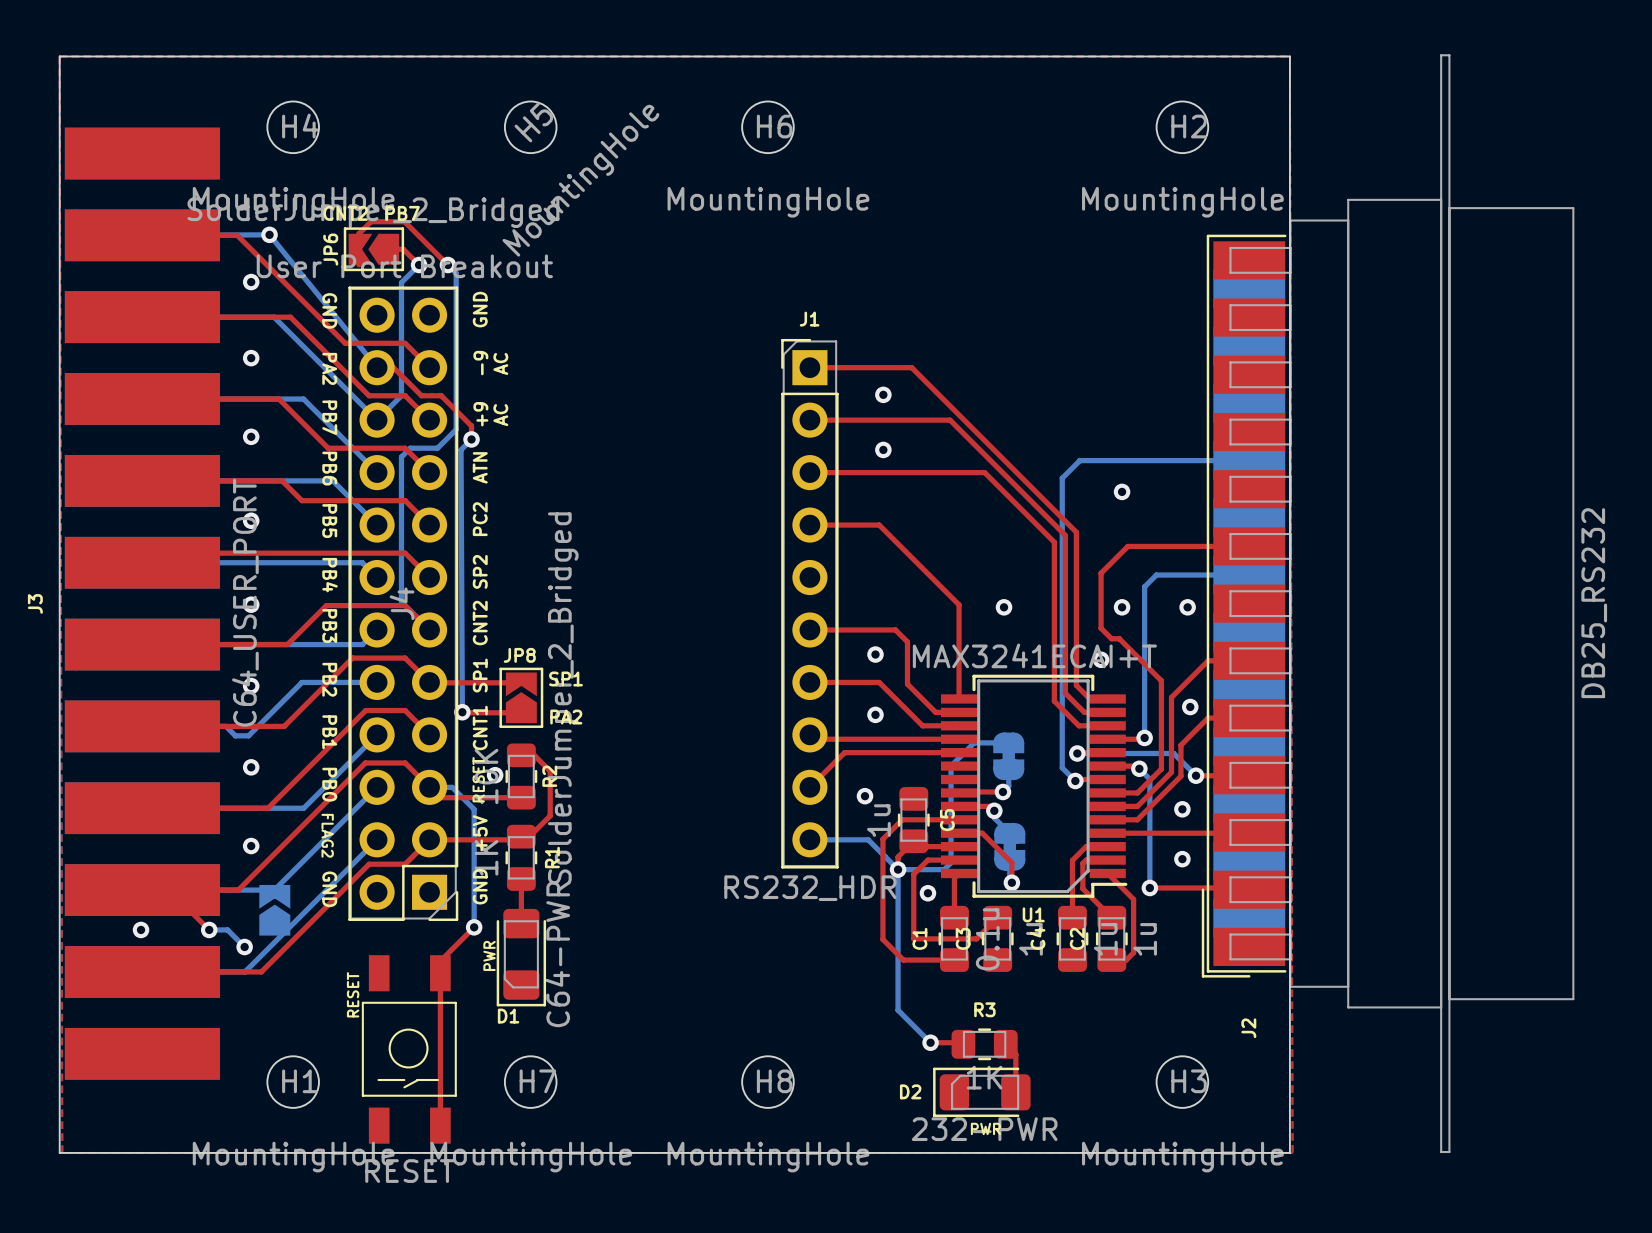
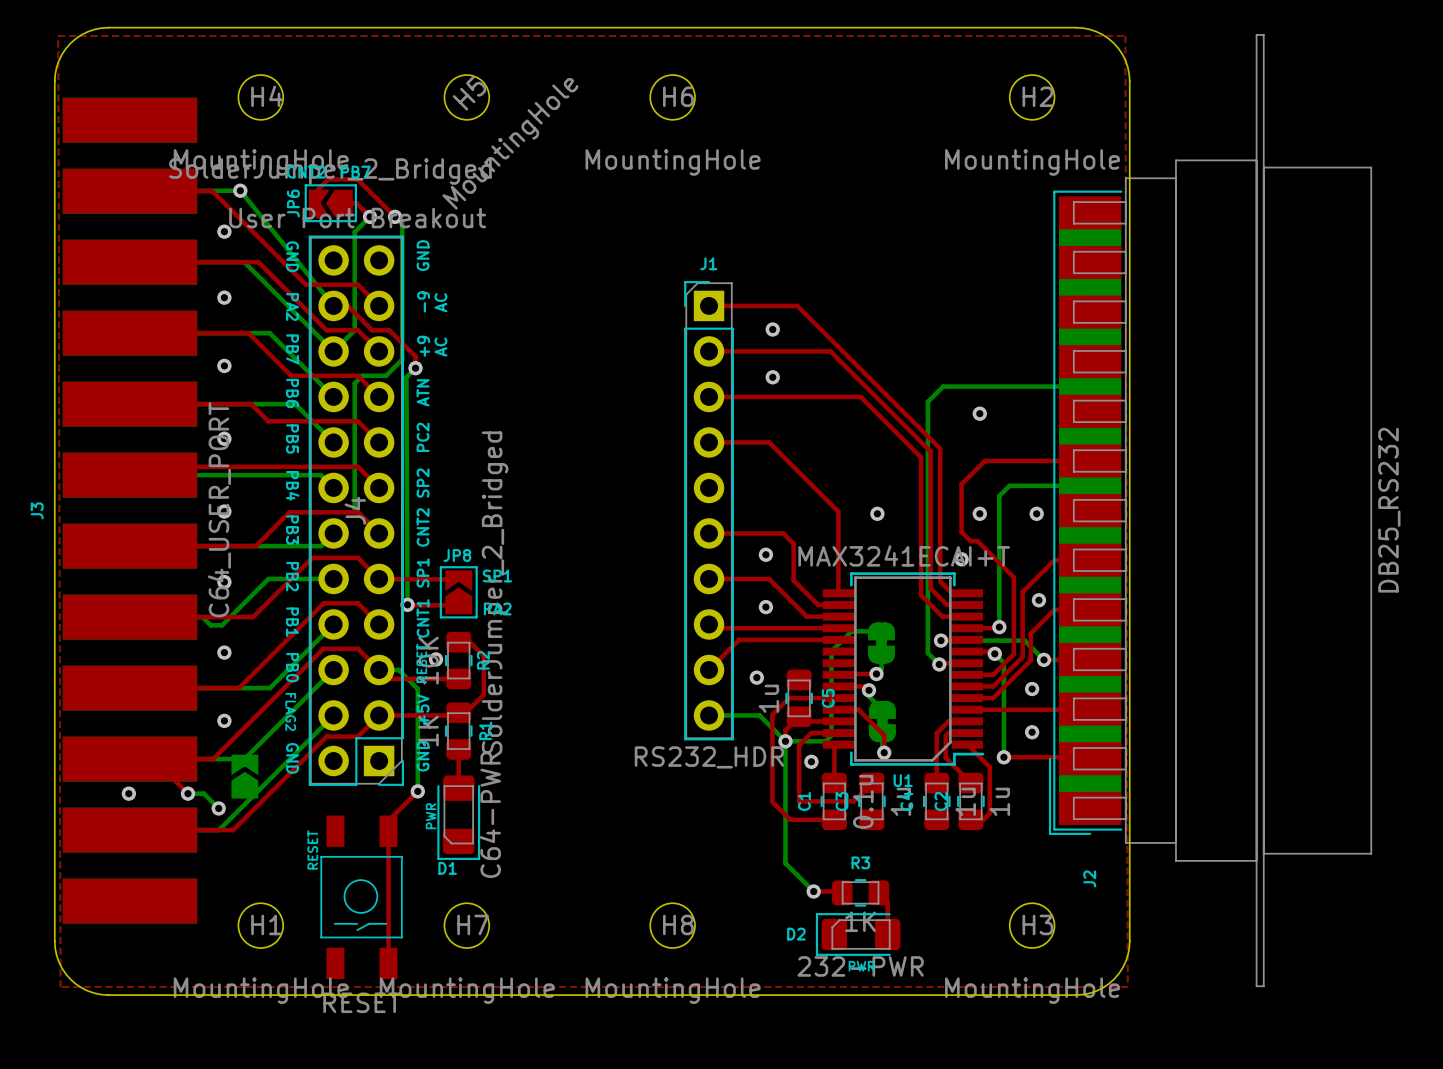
board edge: (59, 56) (1289, 56) (1289, 1152) (59, 1152) (59, 56) -> (108, 27) (87, 31) (70, 43) (58, 60) (54, 81) (54, 941) (58, 961) (70, 979) (87, 990) (108, 995) (1075, 995) (1096, 990) (1113, 979) (1125, 961) (1129, 941) (1129, 81) (1125, 60) (1113, 43) (1096, 31) (1075, 27) (108, 27)

